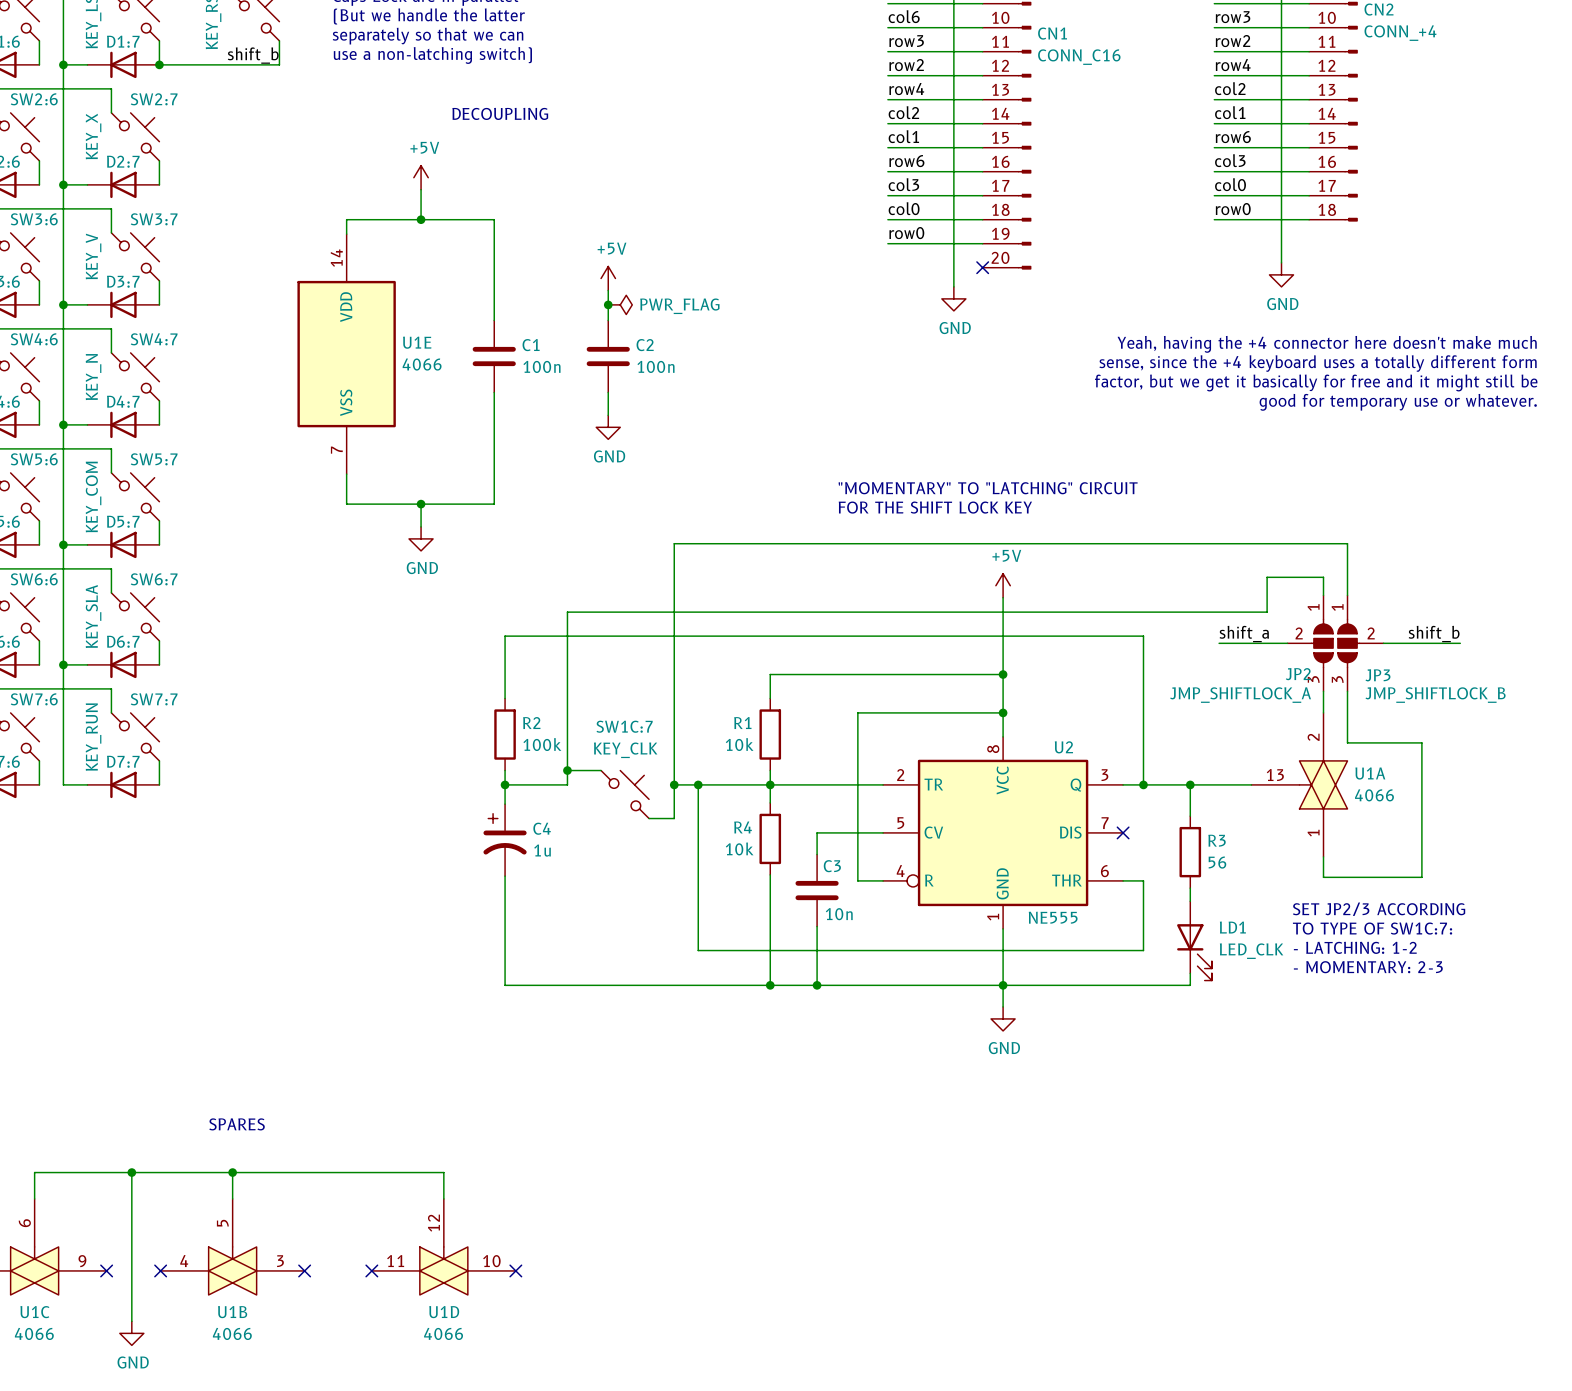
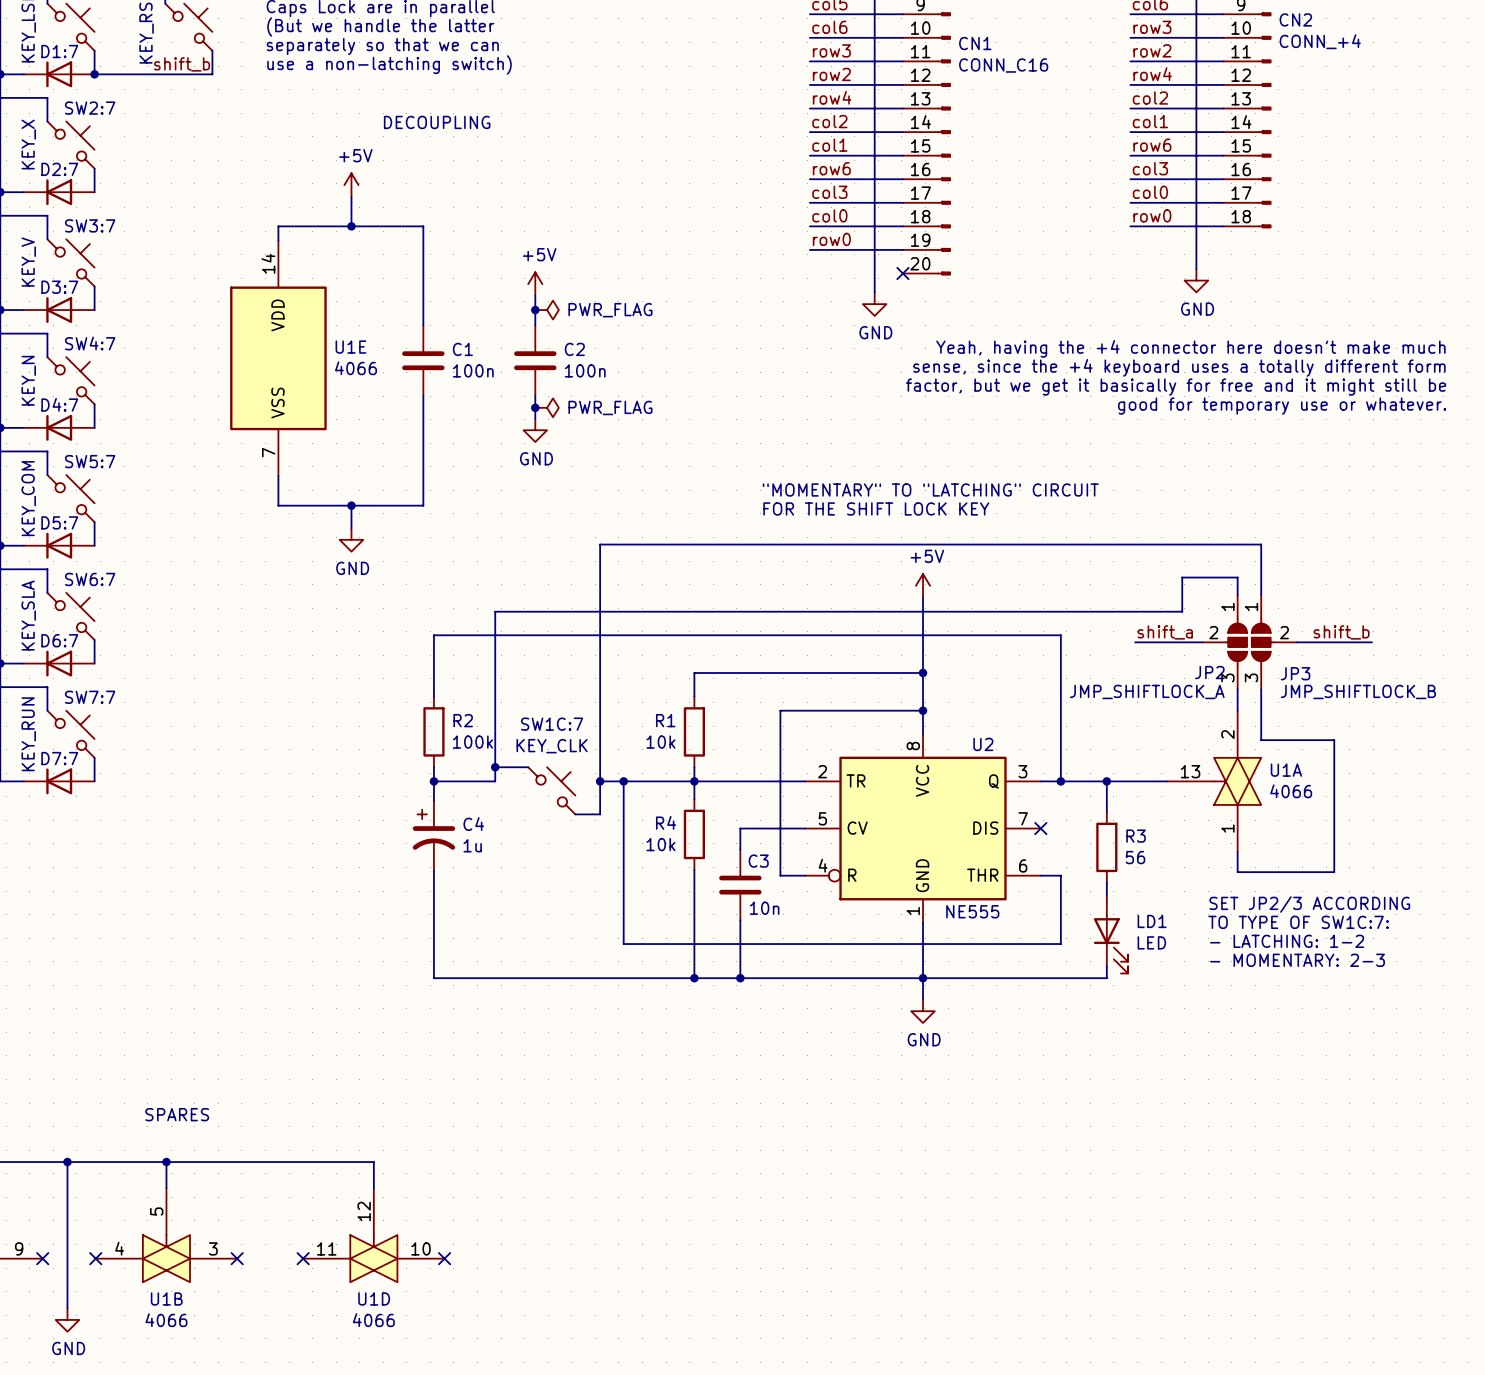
junction: none -> (535, 407)
power symbol: none -> PWR_FLAG (547, 407)
LD1 value: LED_CLK (1251, 951) -> LED (1151, 942)

